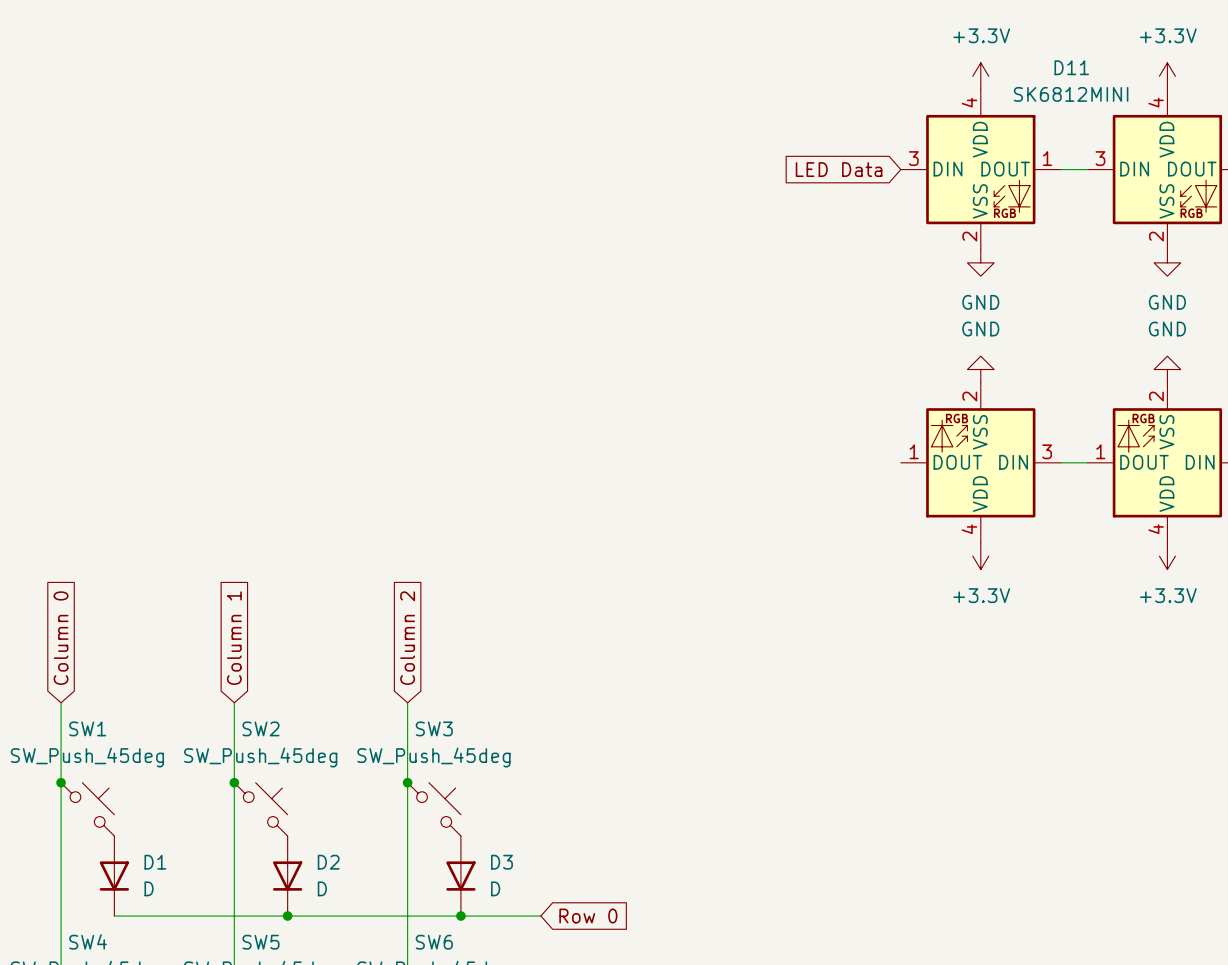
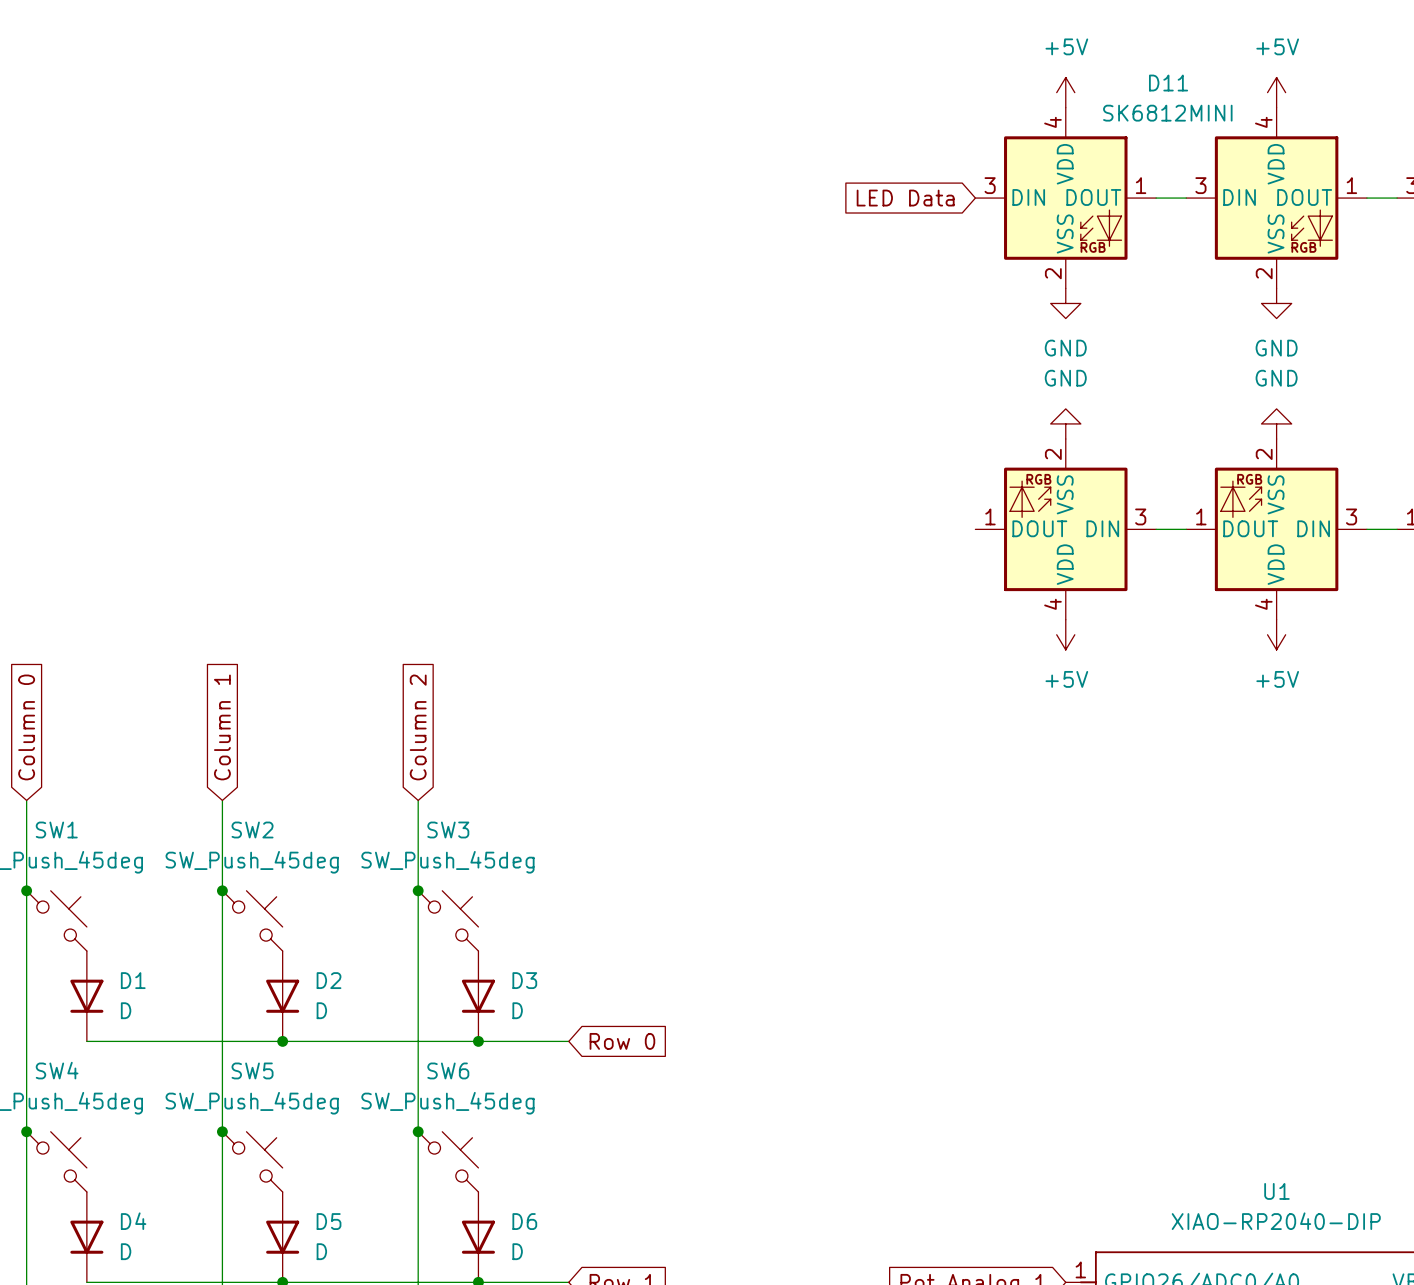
power symbol: +3.3V (980, 76) -> +5V (1065, 92)
power symbol: +3.3V (1167, 76) -> +5V (1276, 92)
power symbol: +3.3V (980, 556) -> +5V (1065, 634)
power symbol: +3.3V (1167, 556) -> +5V (1276, 634)

